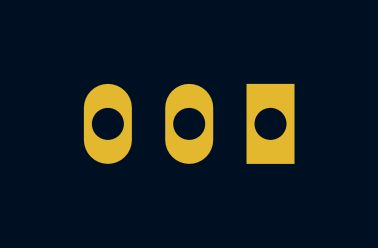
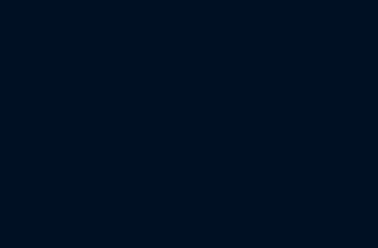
part: (189, 123) -> none

